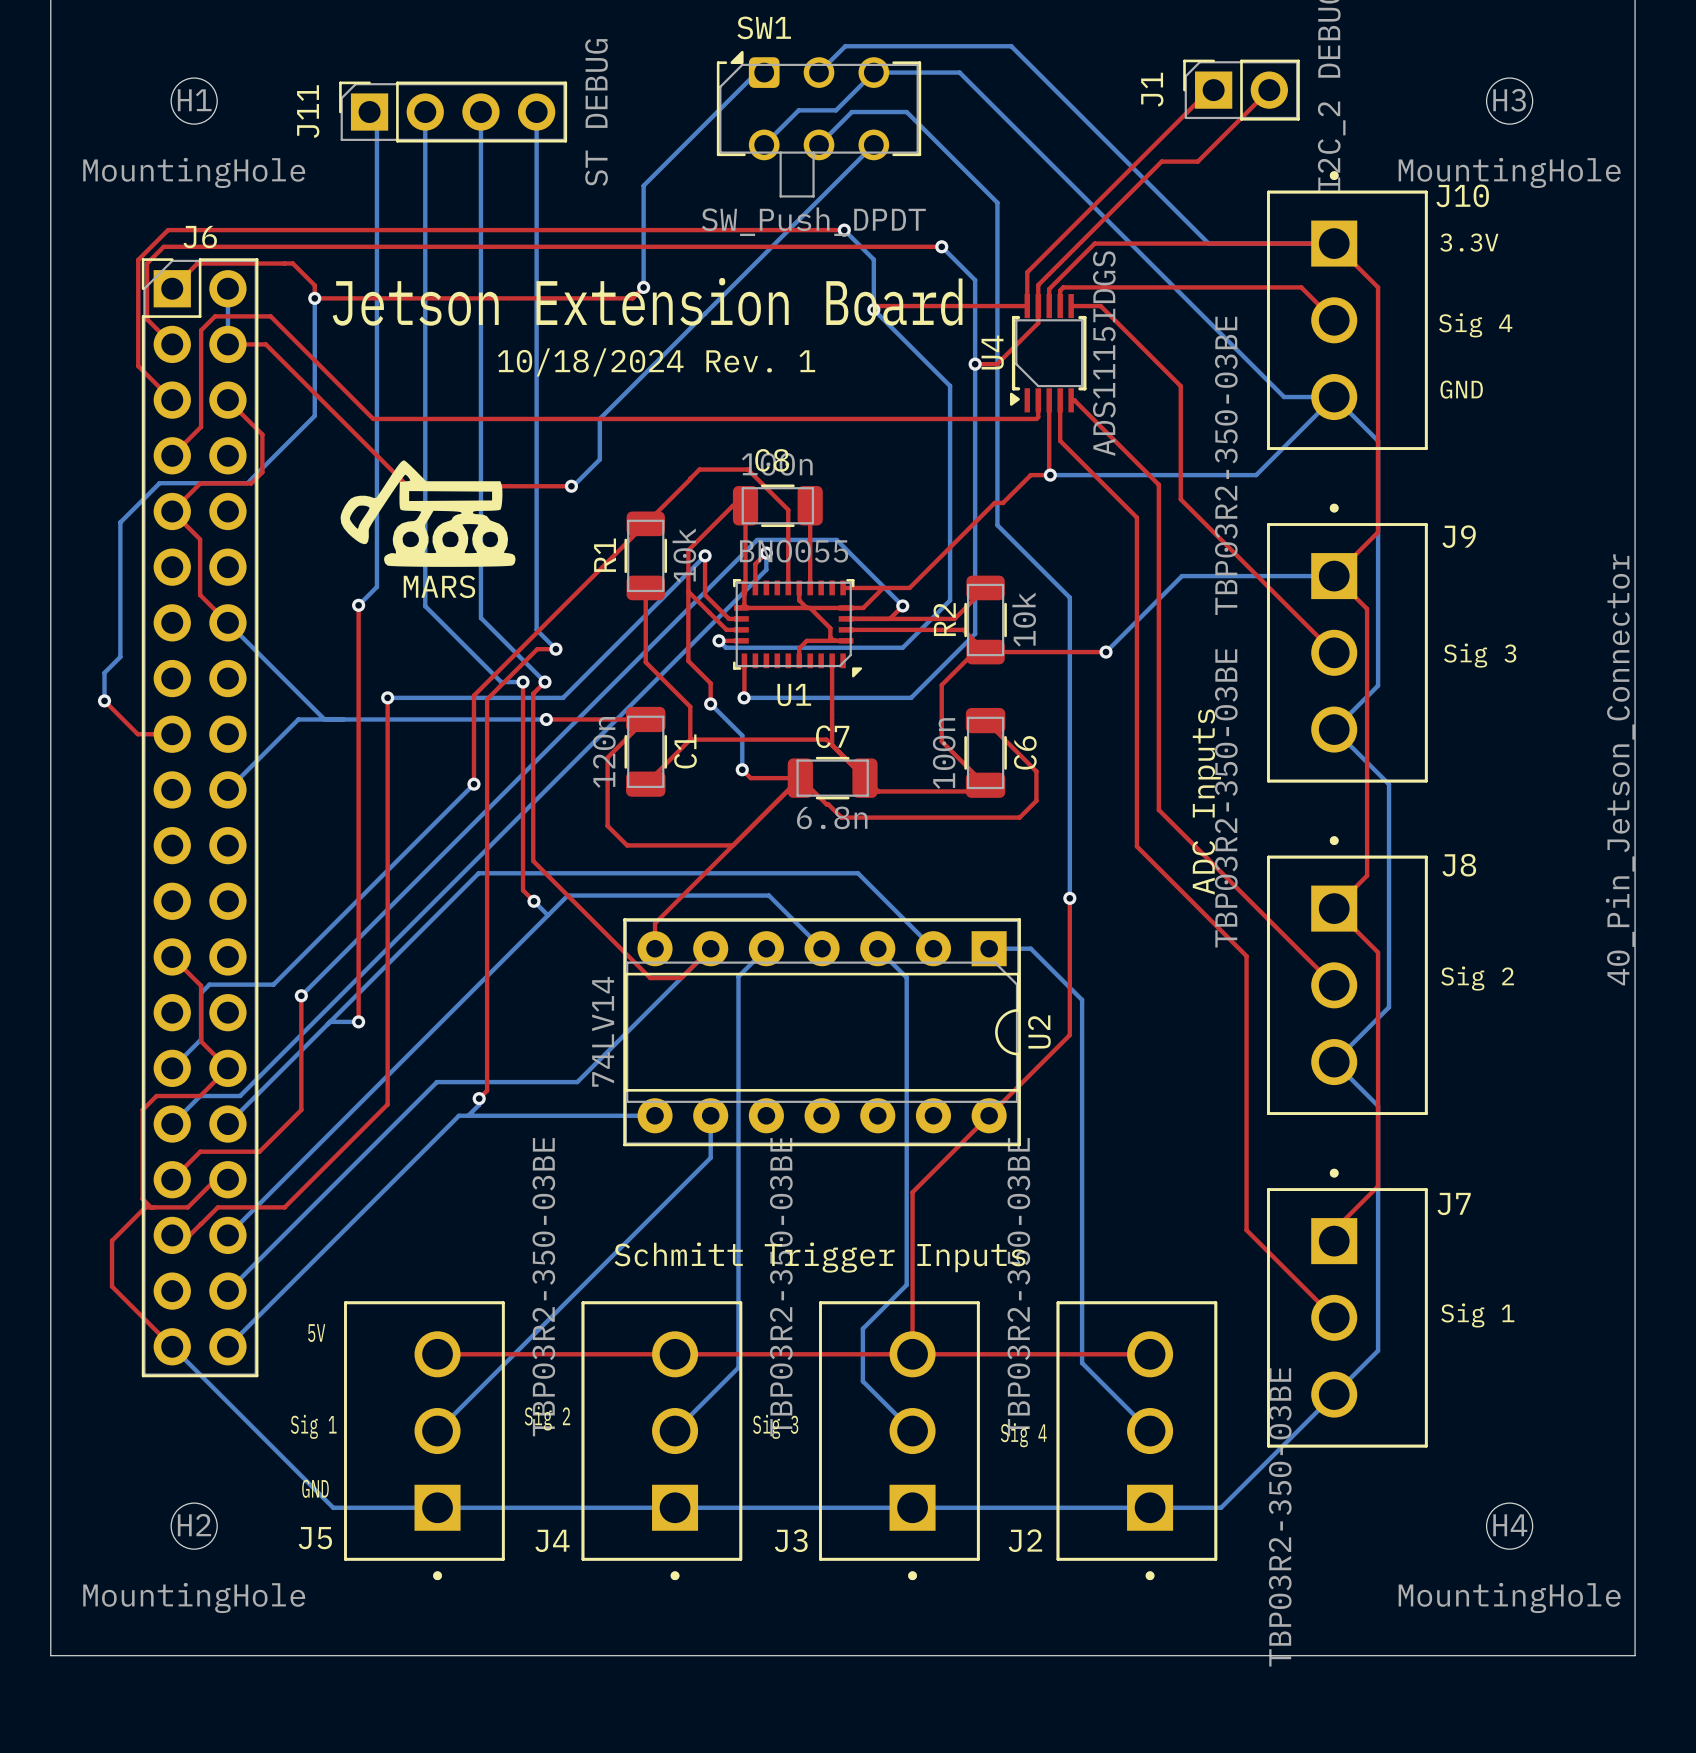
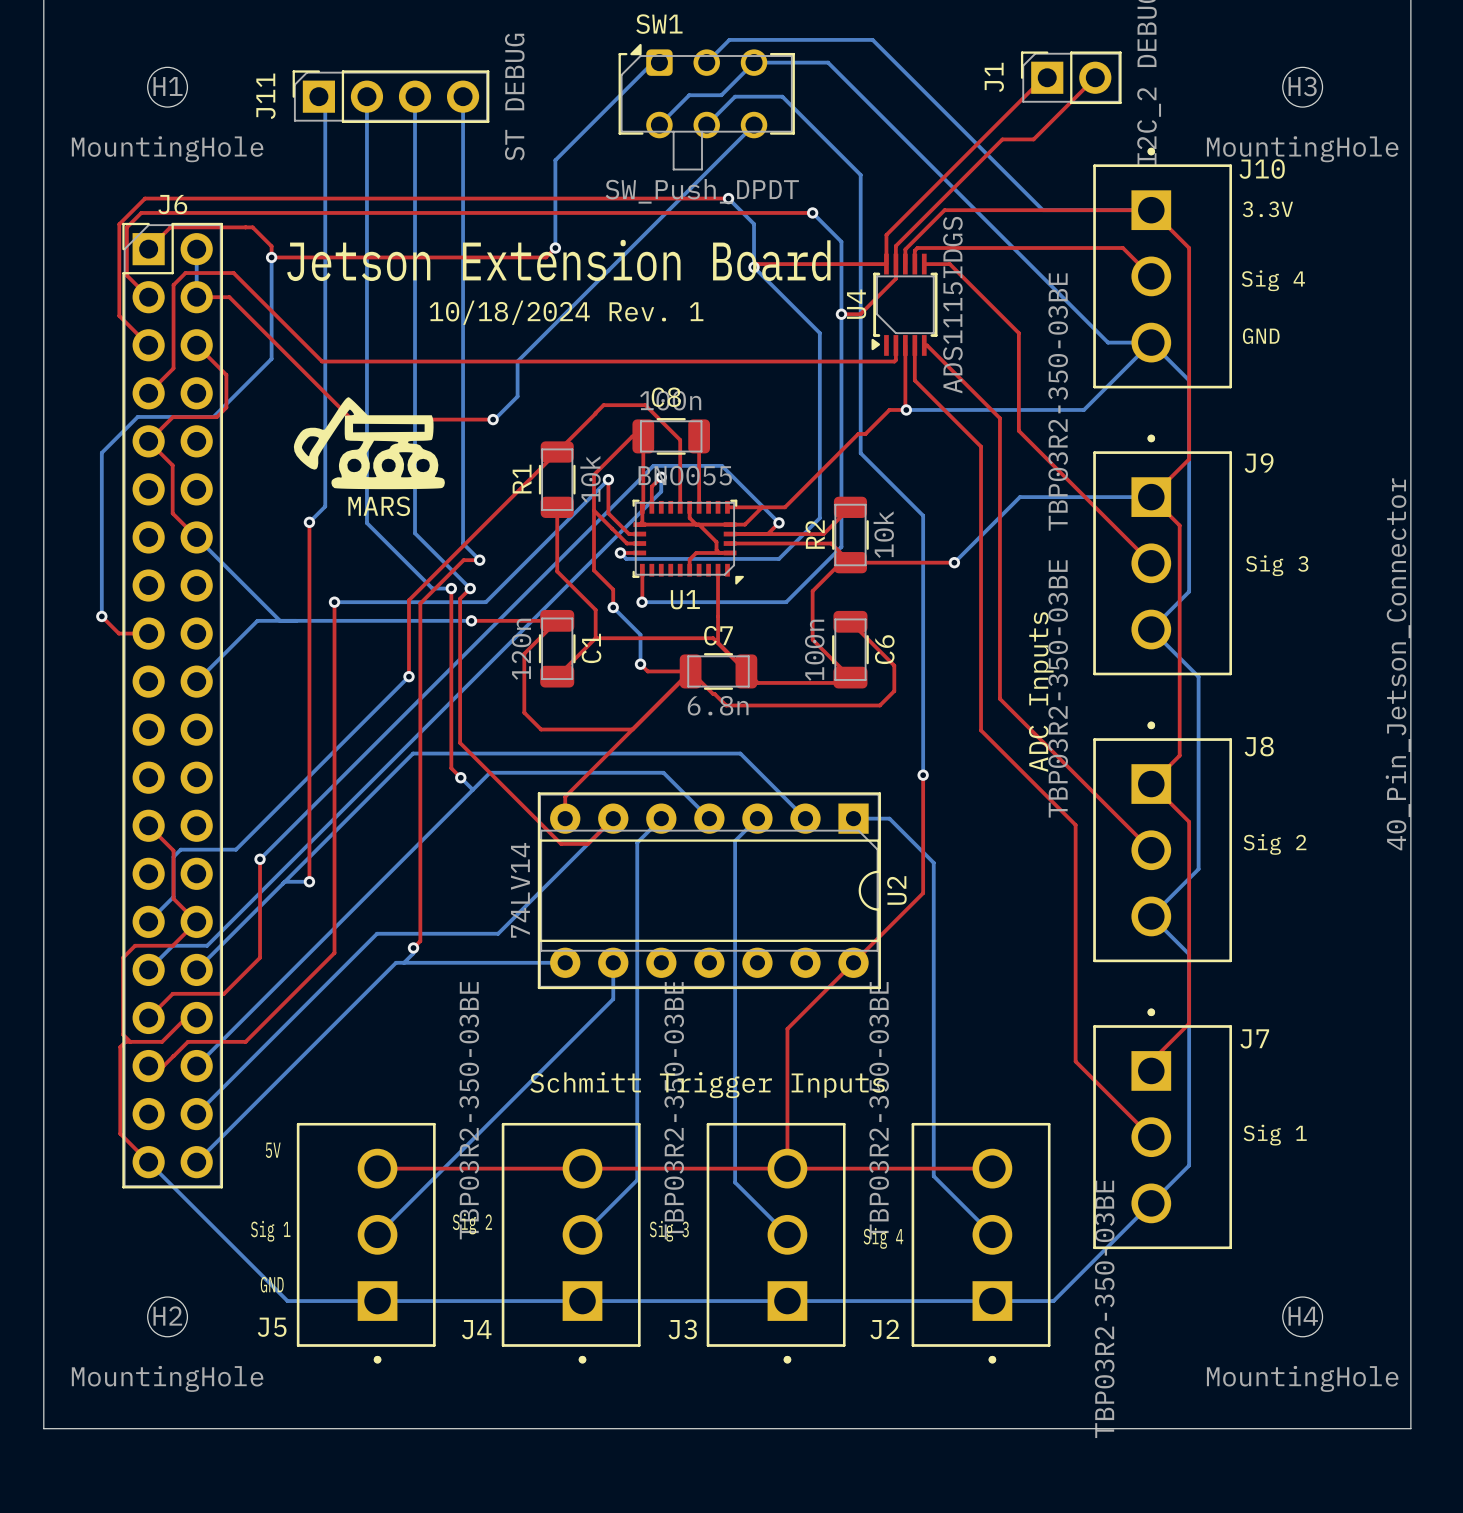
bottom track: (120, 522) (120, 656) (104, 672) (104, 700) -> (103, 450) (101, 452) (101, 616)
top track: (104, 700) (118, 714) -> none
via position: (104, 700) -> (101, 616)
bottom track: (877, 948) (906, 977) (906, 1284) (862, 1328) (862, 1381) -> (757, 818) (735, 840) (735, 1182) (744, 1191)
top track: (139, 1213) (112, 1240) (112, 1286) (139, 1313) -> (120, 1047) (120, 1133)

